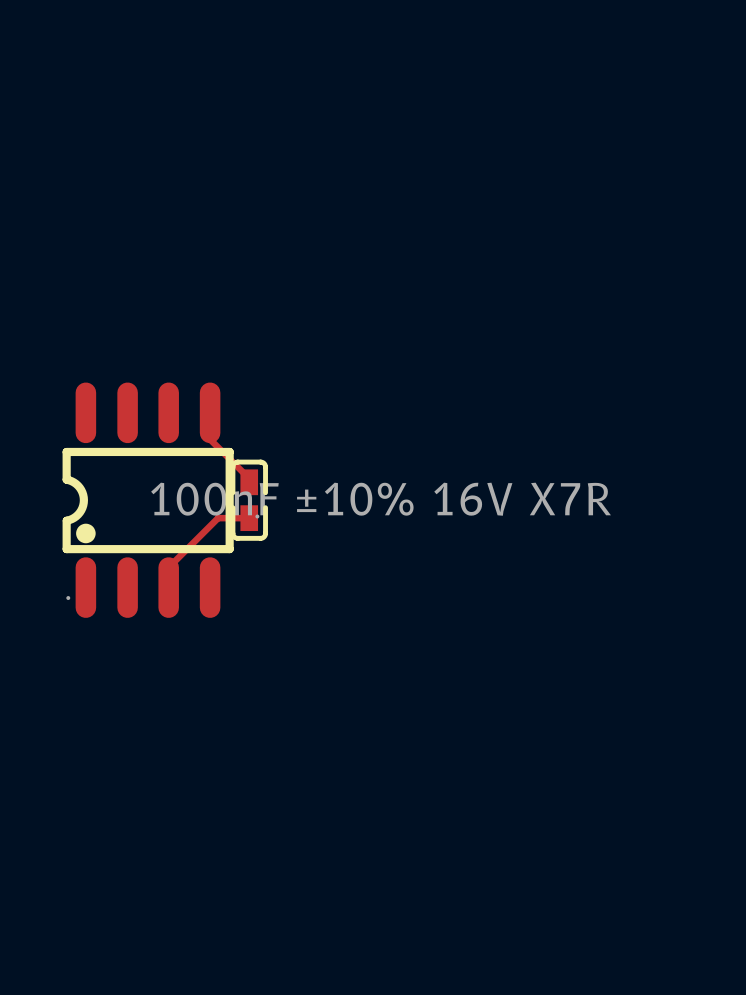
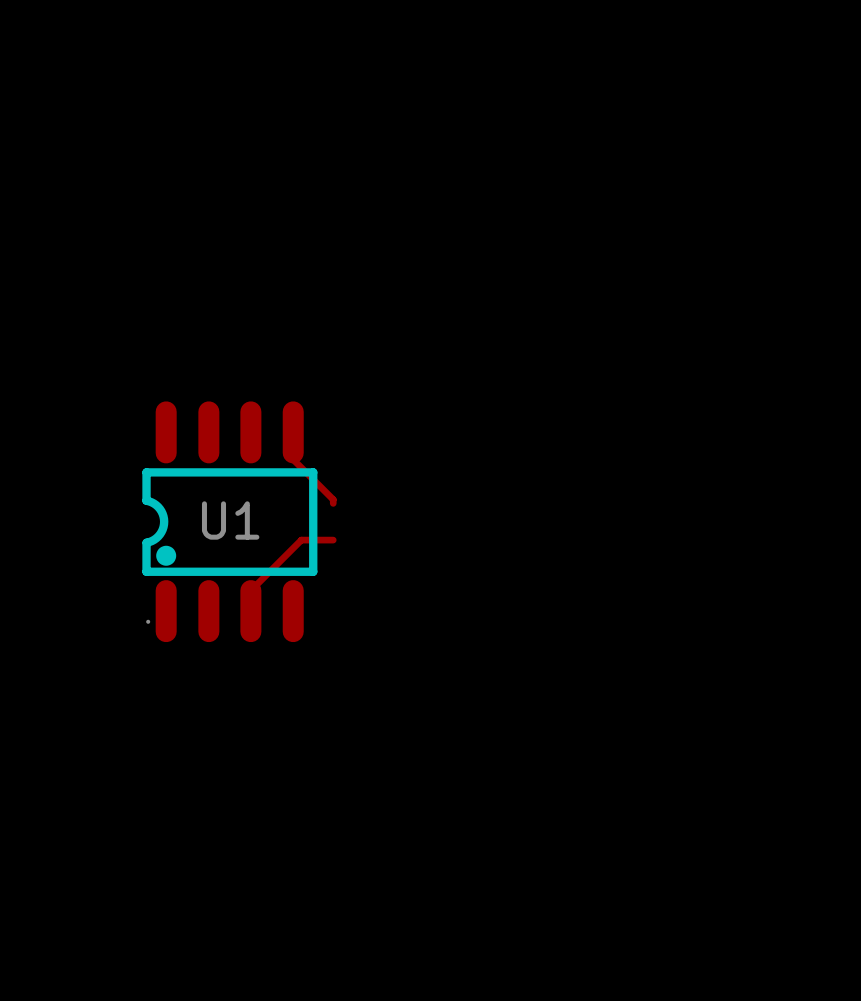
U1 name: none -> U1 (230, 520)
part: 100nF ±10% 16V X7R (249, 500) -> none

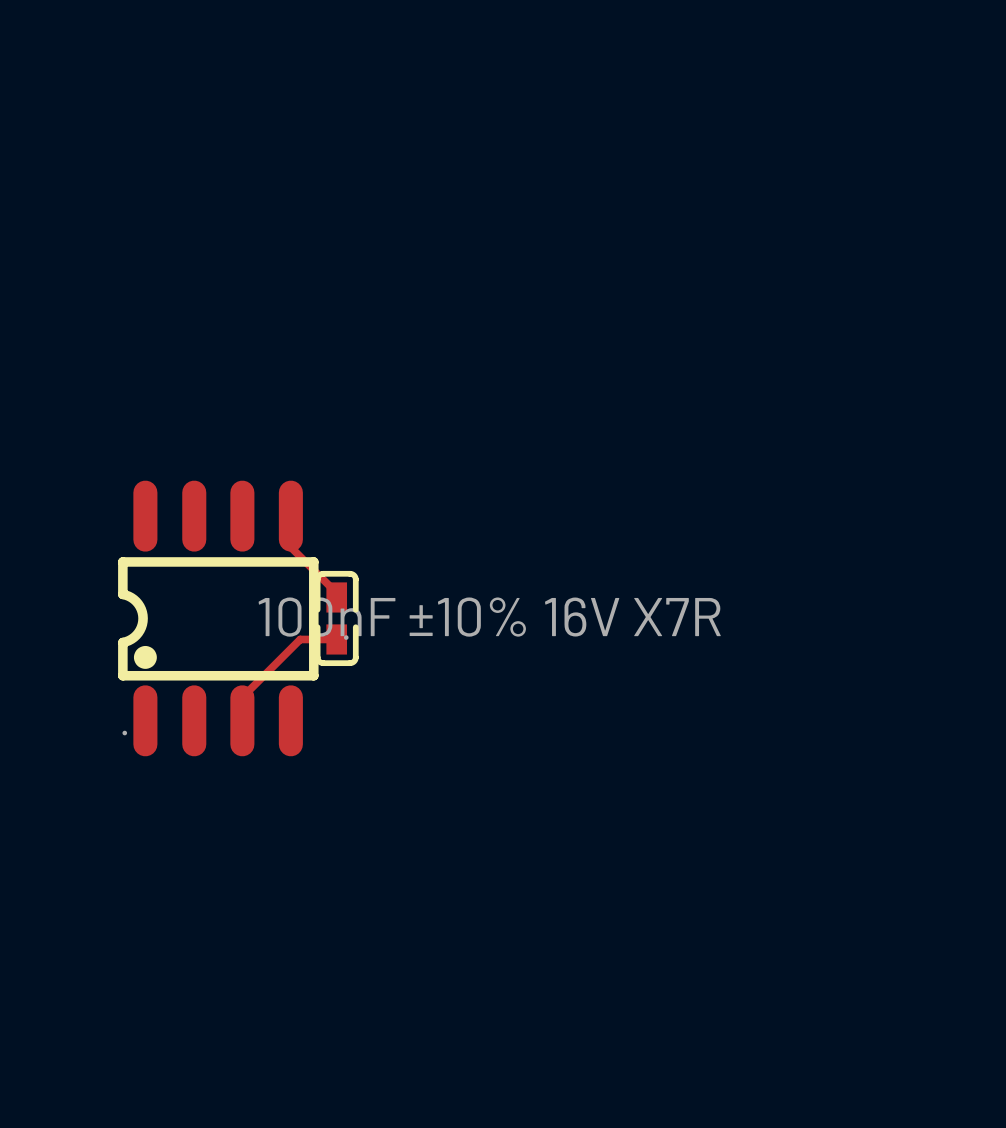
U1 name: U1 (230, 520) -> none
part: none -> 100nF ±10% 16V X7R (336, 618)

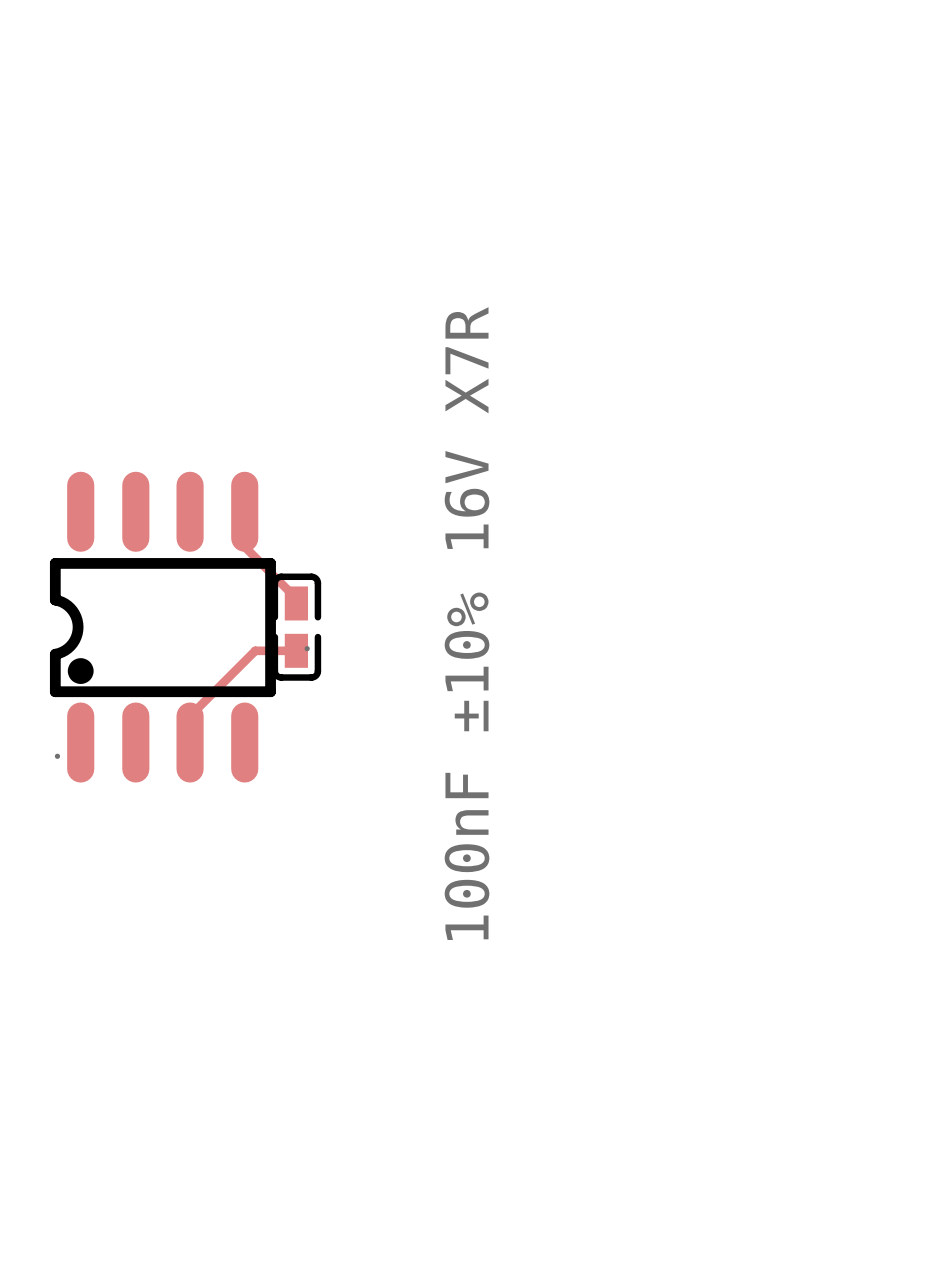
part value rotation: 0° (489, 617) -> 90° counterclockwise (467, 623)

